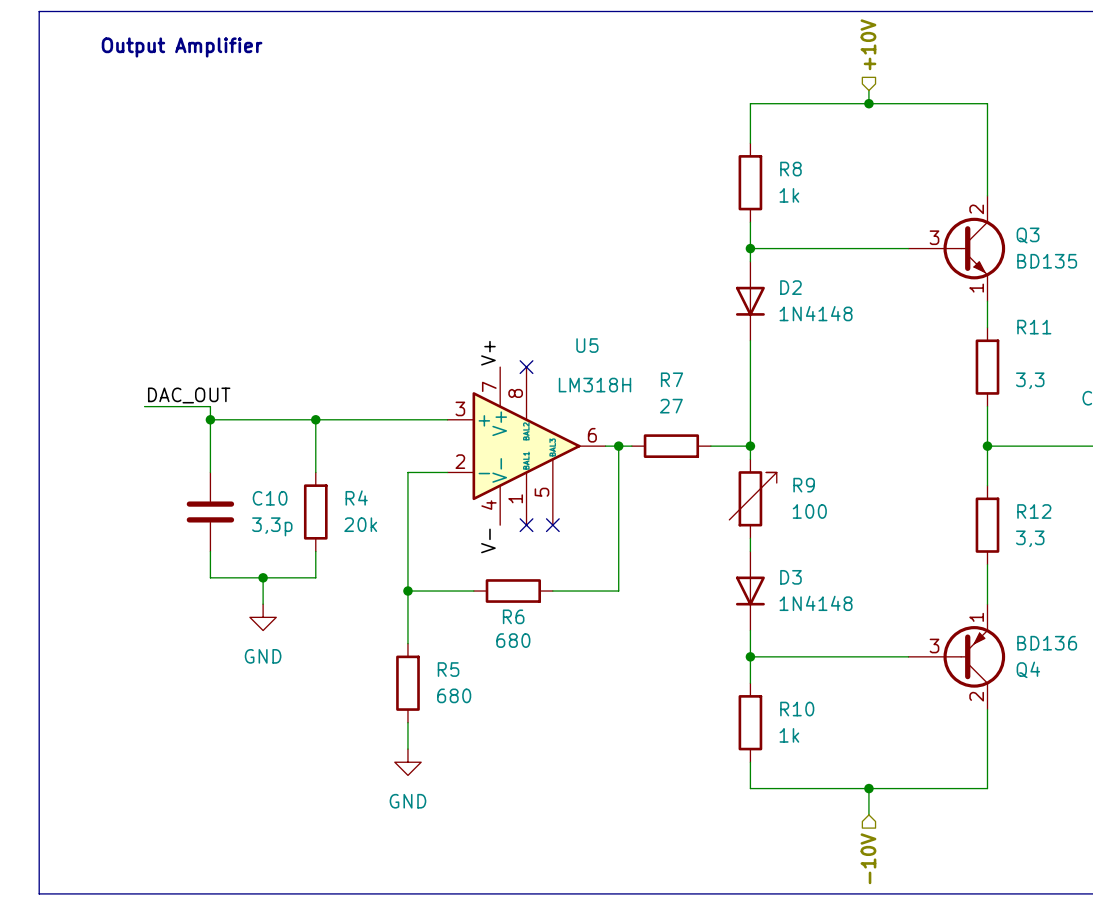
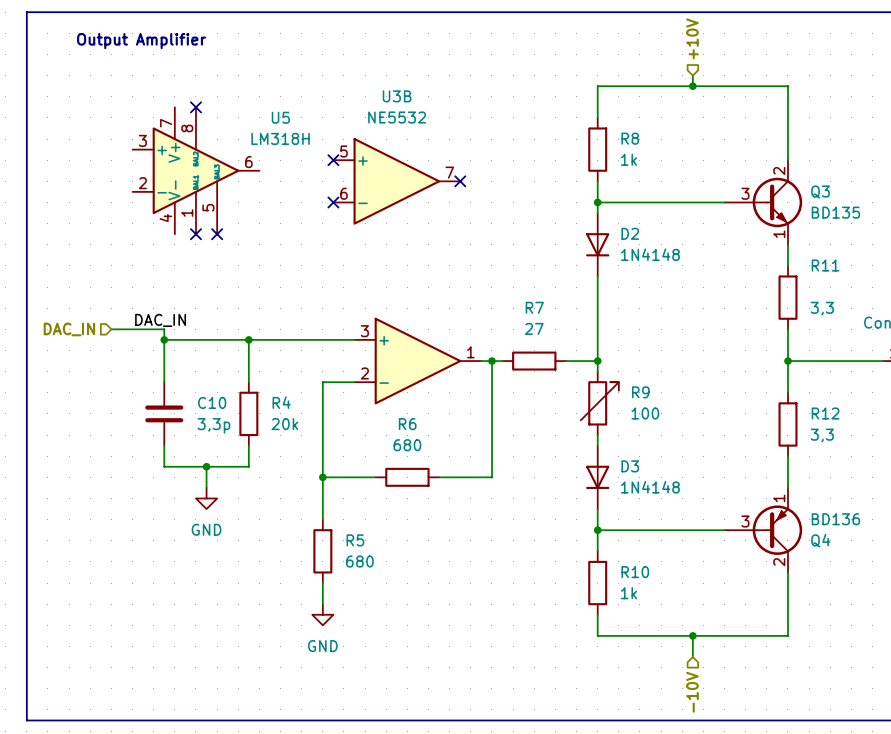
no-connect mark: none -> (195, 107)
no-connect mark: none -> (333, 160)
U3B: none -> NE5532 (396, 181)
no-connect mark: none -> (460, 181)
no-connect mark: none -> (333, 202)
no-connect mark: none -> (195, 234)
no-connect mark: none -> (217, 234)
U5 name position: U5 (587, 345) -> U5 (280, 117)
label: V+ (488, 353) -> none
no-connect mark: (526, 367) -> none
U5 value position: LM318H (595, 385) -> LM318H (280, 138)
label: DAC_OUT (189, 395) -> DAC_IN (160, 320)
hierarchical label: none -> DAC_IN (69, 329)
U5 position: (526, 446) -> (195, 170)
part: none -> (417, 361)
no-connect mark: (526, 525) -> none
no-connect mark: (552, 525) -> none
label: V- (488, 540) -> none
R6 name position: R6 (513, 616) -> R6 (407, 424)
R6 value position: 680 (513, 640) -> 680 (407, 445)

